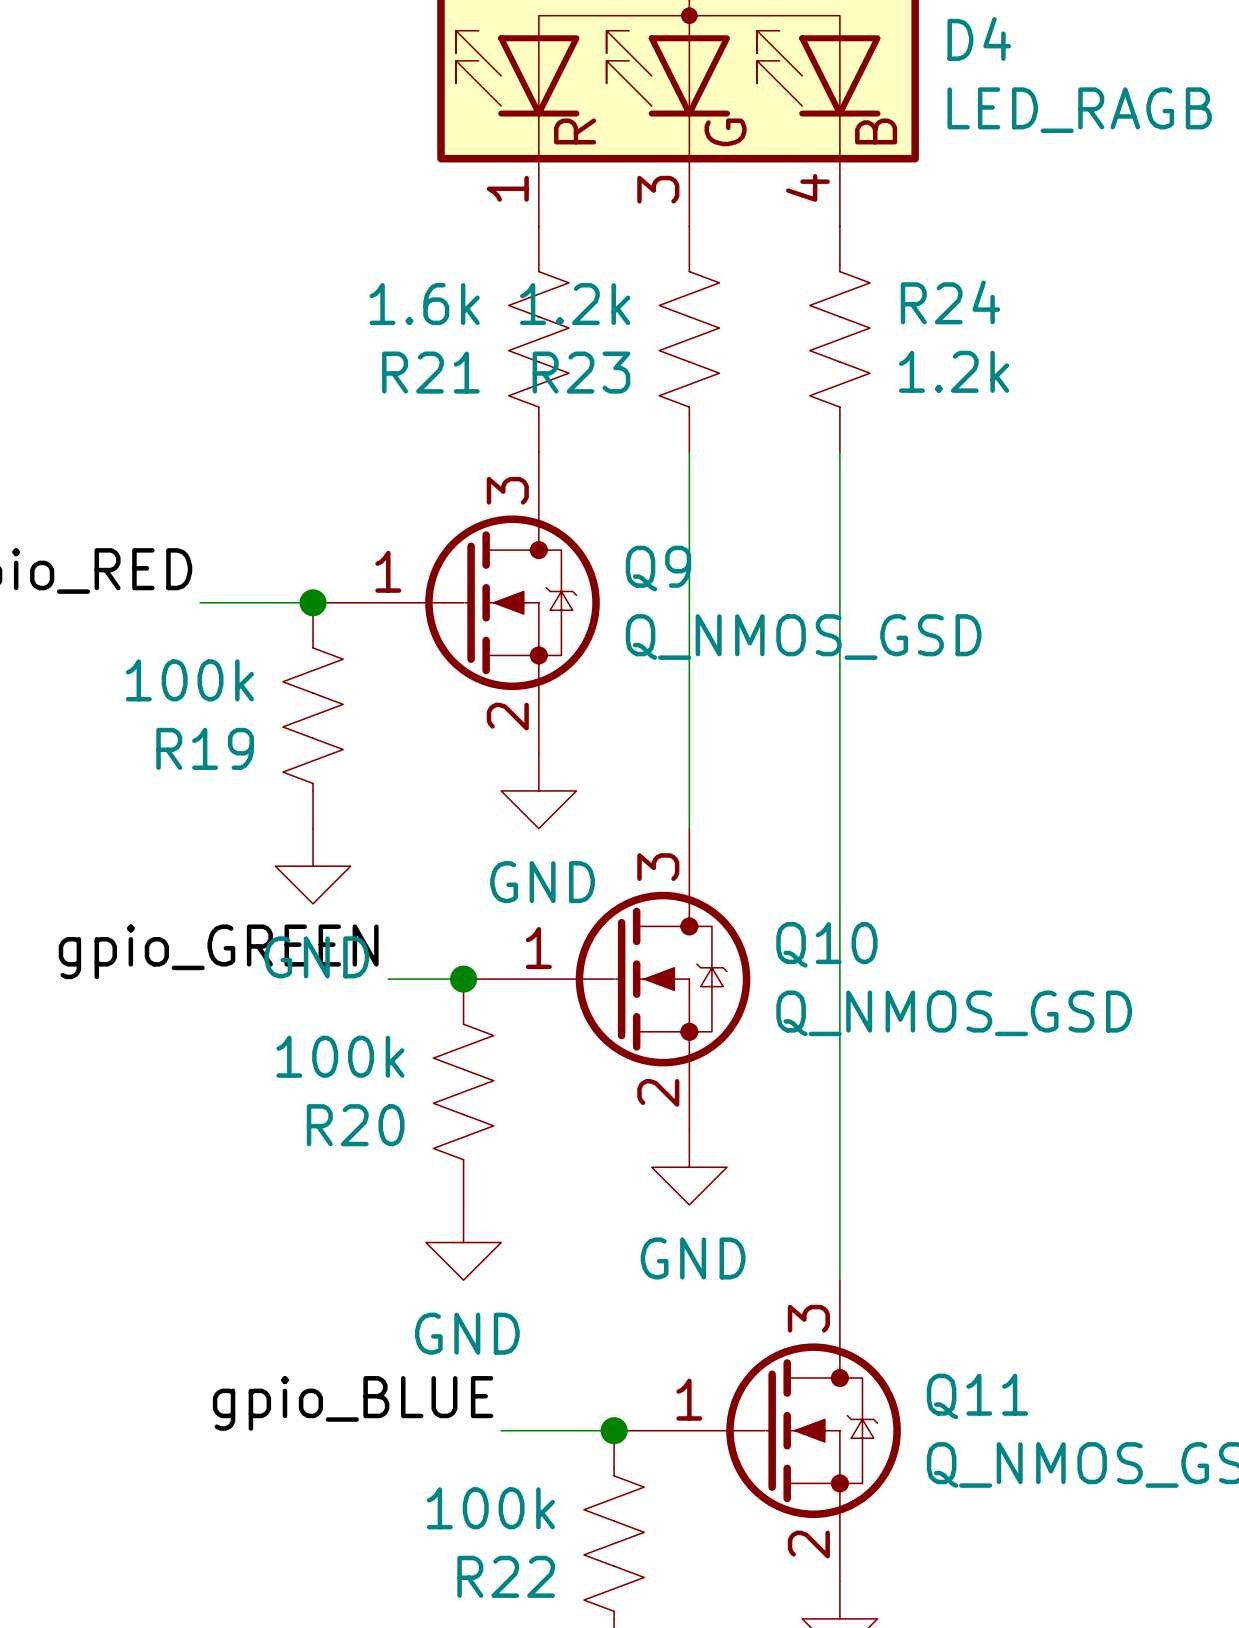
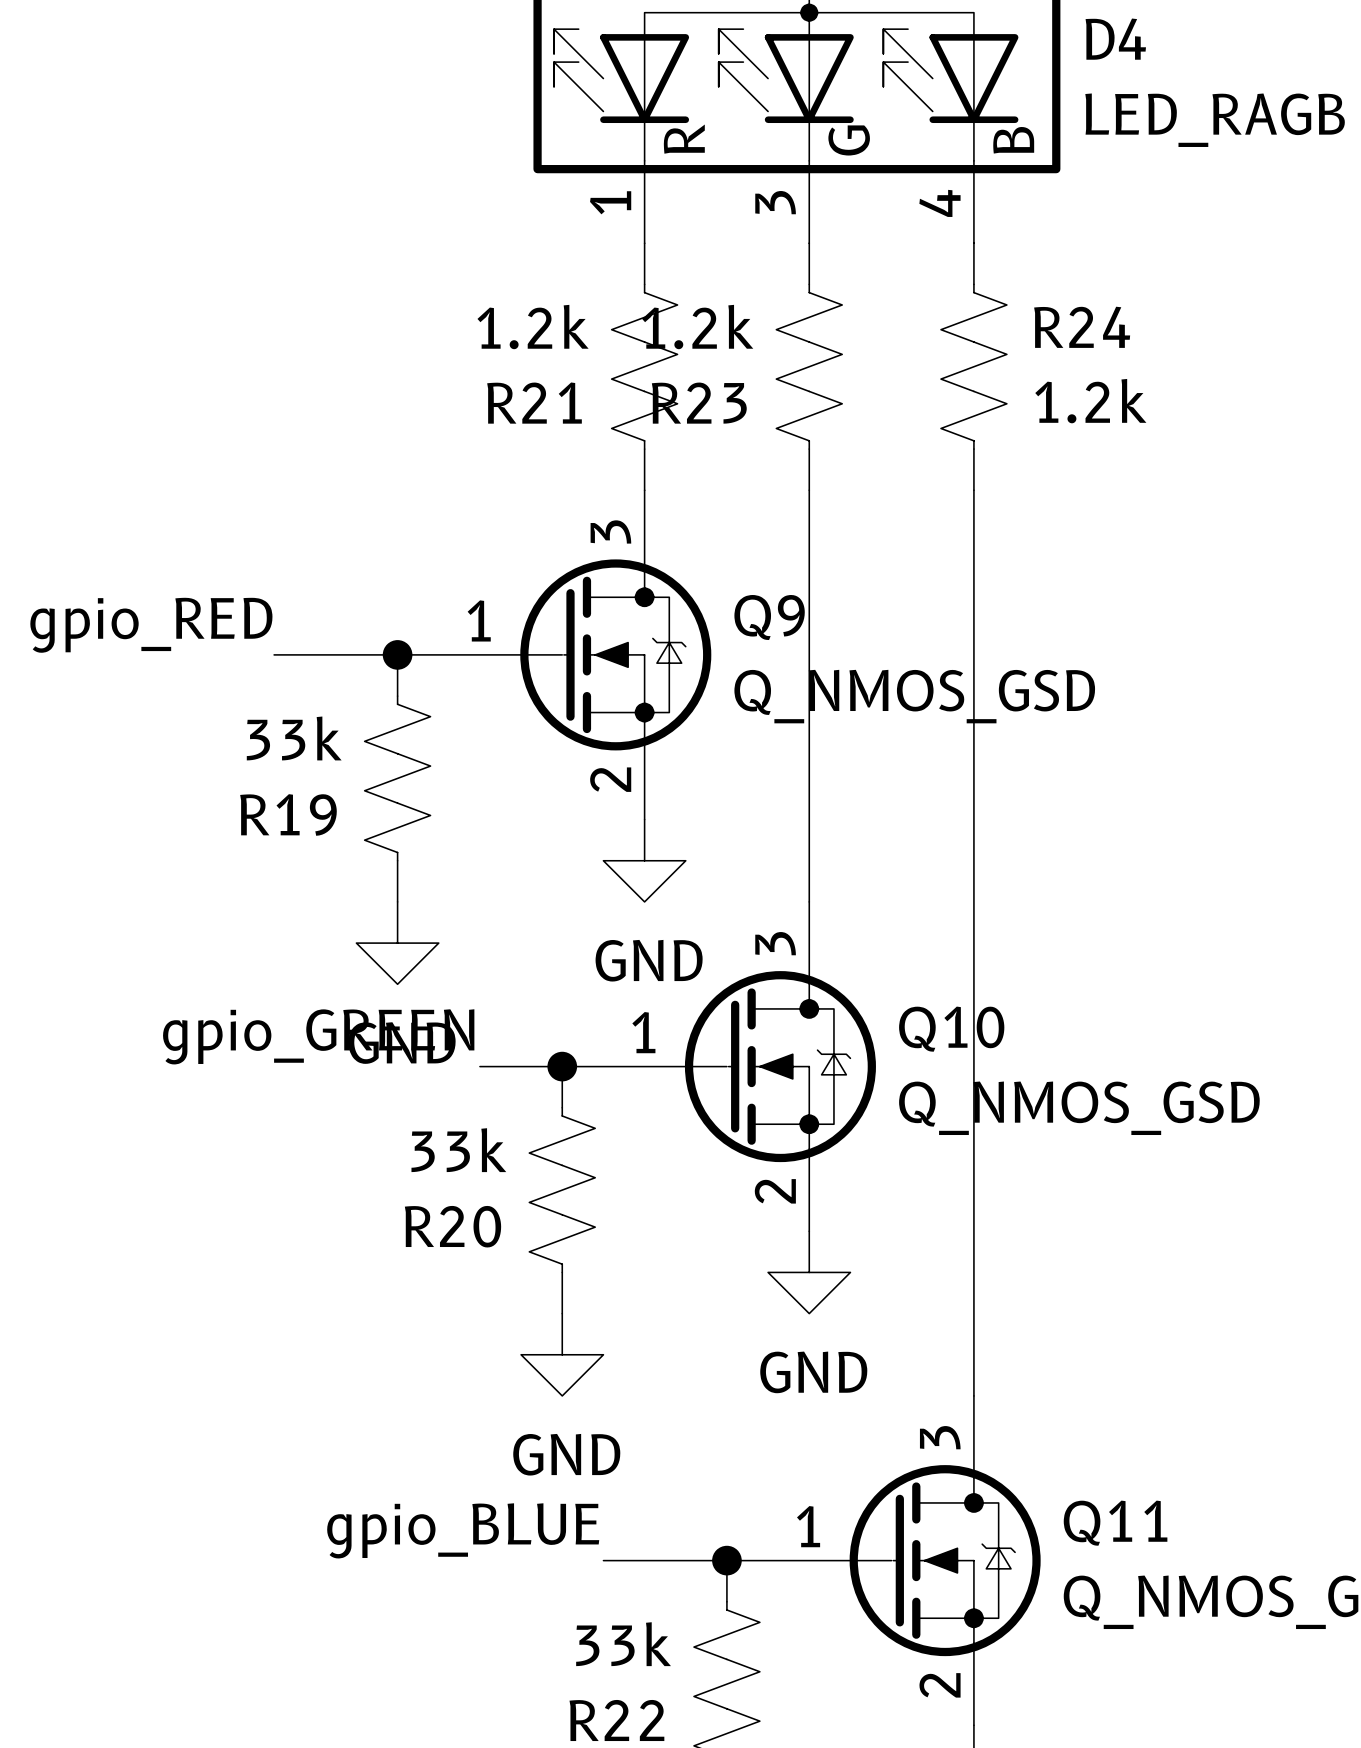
R21 value: 1.6k (424, 304) -> 1.2k (533, 327)
R19 value: 100k (189, 680) -> 33k (294, 738)
R20 value: 100k (340, 1056) -> 33k (458, 1150)
R22 value: 100k (490, 1508) -> 33k (623, 1644)

